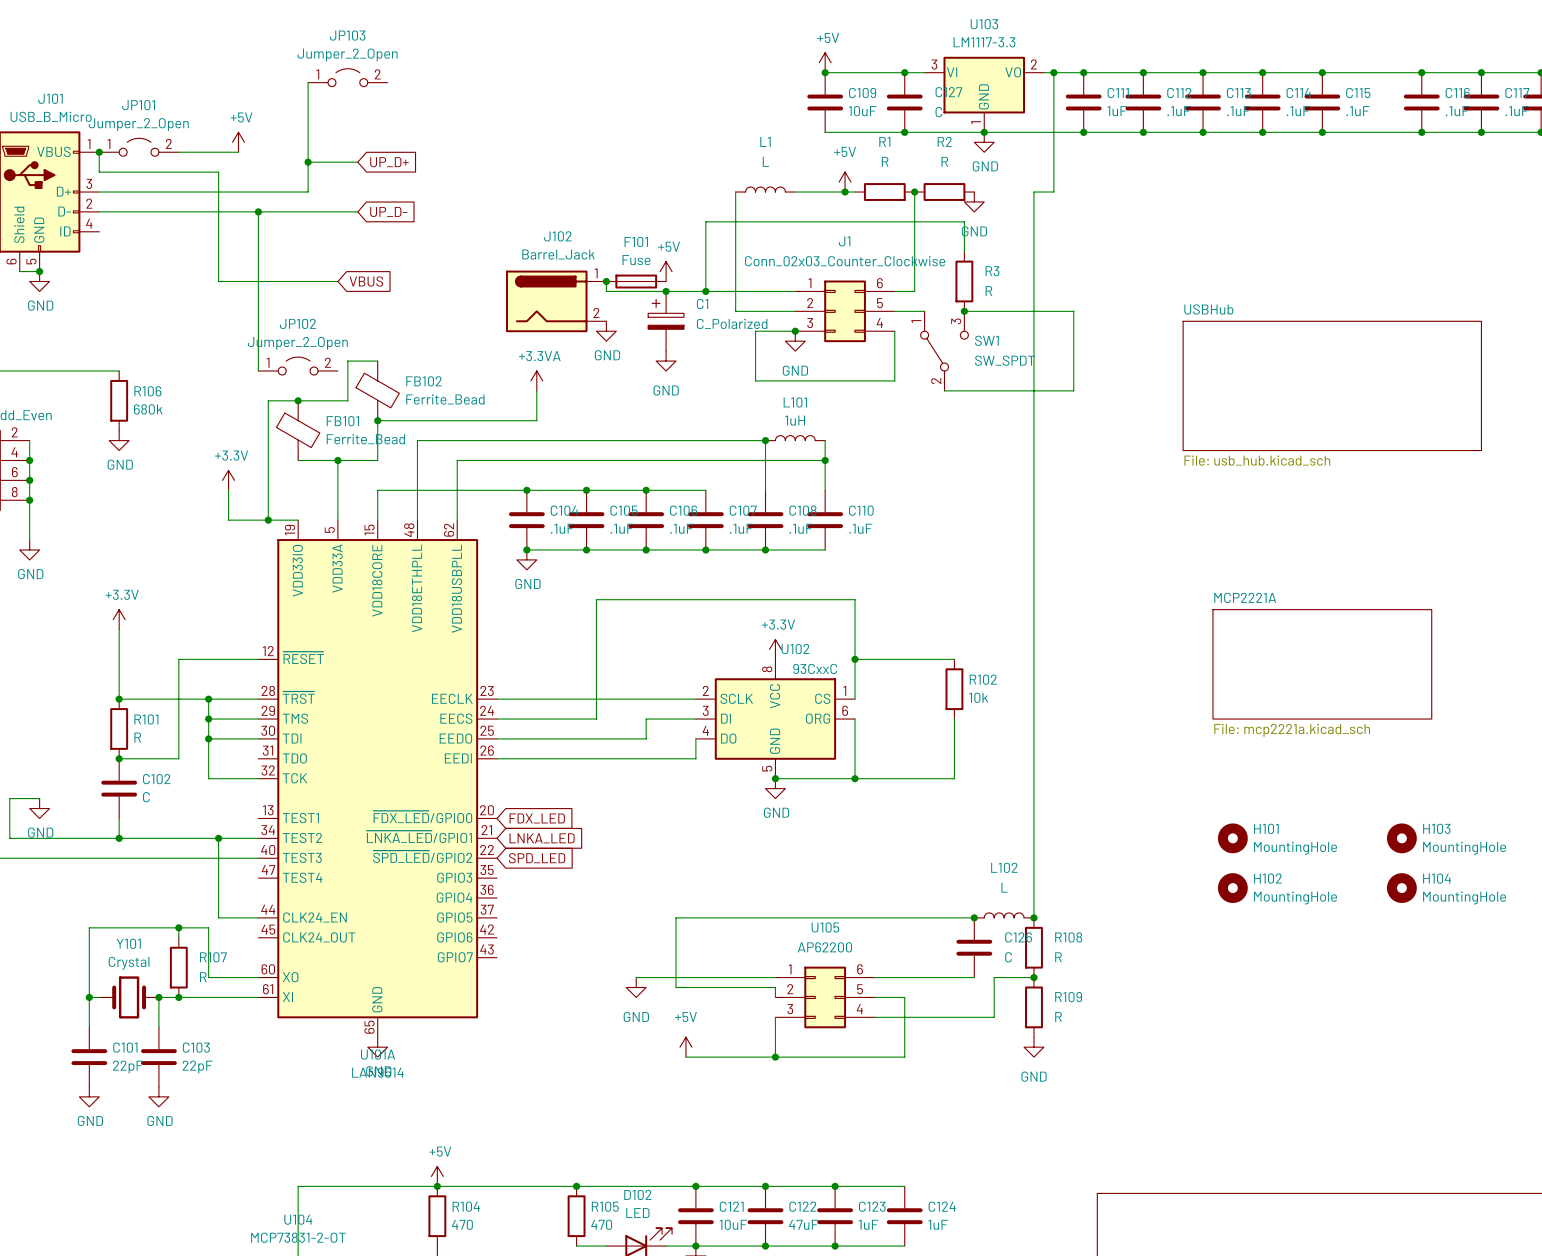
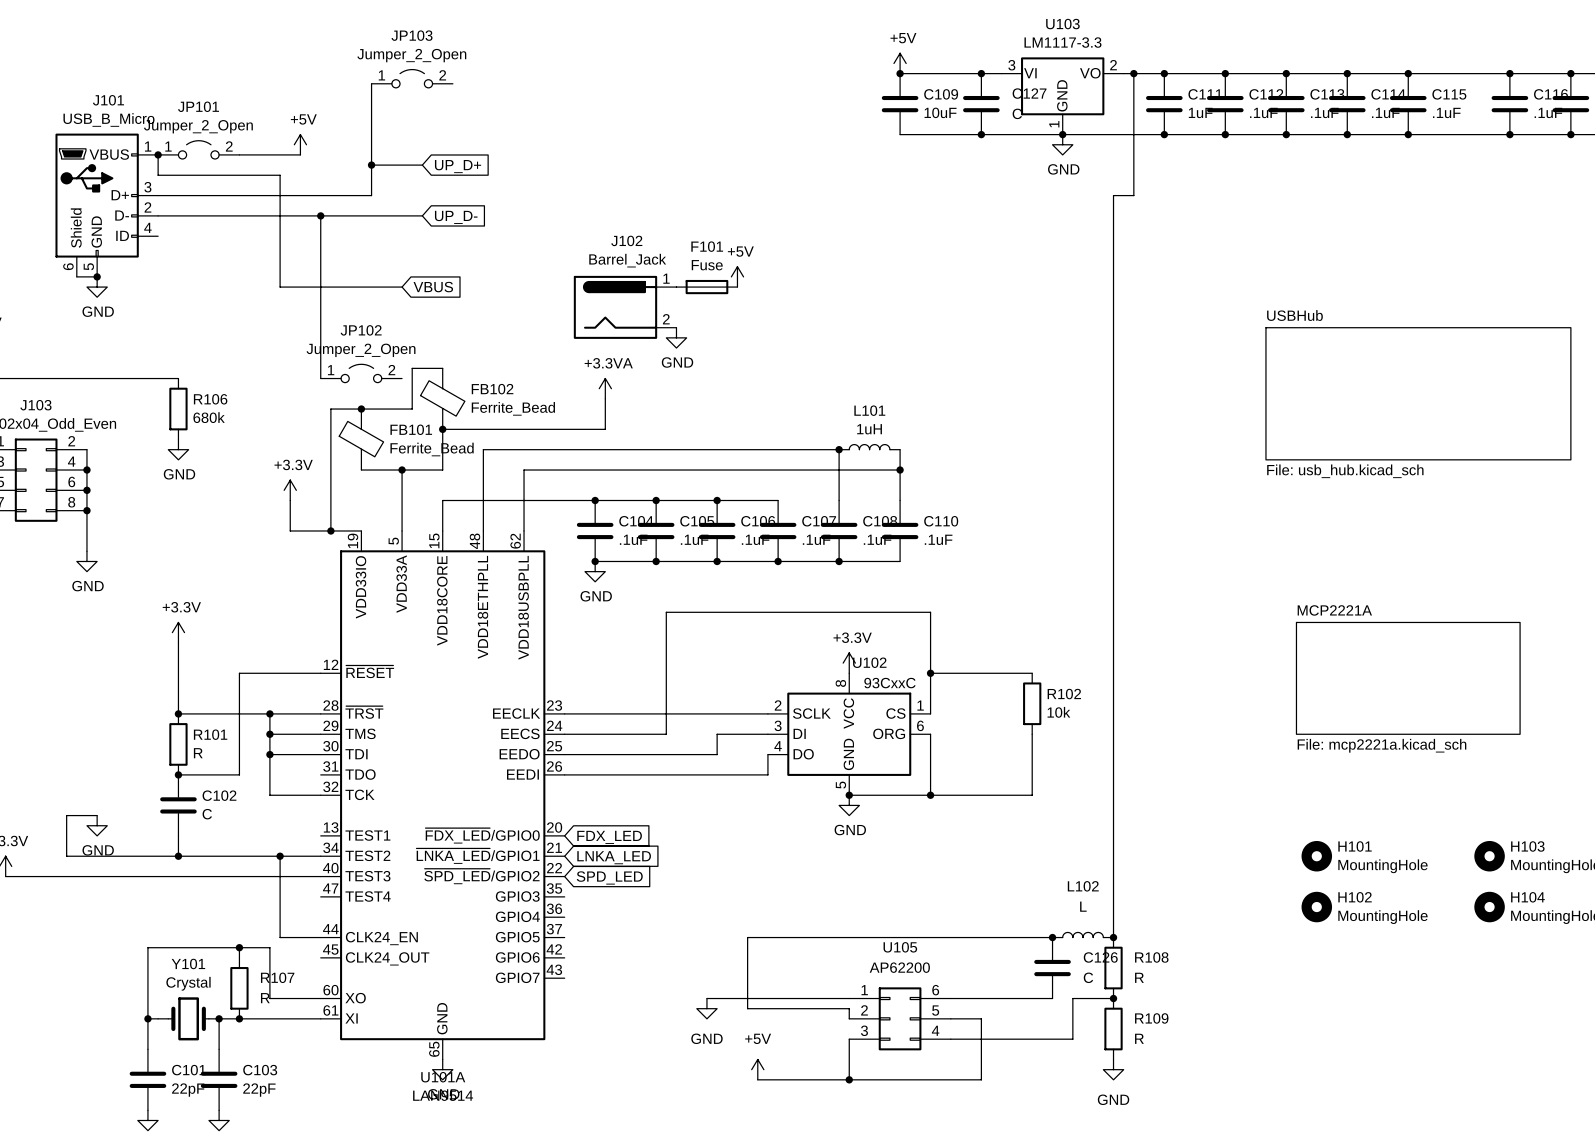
power symbol: +5V (845, 182) -> none
L1: L (765, 189) -> none
wire: (735, 192) (735, 311) (795, 311) -> none
wire: (795, 192) (855, 192) -> none
junction: (845, 192) -> none
R1: R (884, 192) -> none
wire: (914, 192) (914, 291) (894, 291) -> none
junction: (914, 192) -> none
R2: R (944, 192) -> none
power symbol: GND (974, 201) -> none
wire: (964, 251) (964, 221) (705, 221) (705, 291) -> none
wire: (606, 281) (606, 291) (795, 291) -> none
junction: (606, 281) -> none
R3: R (964, 281) -> none
junction: (666, 291) -> none
junction: (705, 291) -> none
J1: Conn_02x03_Counter_Clockwise (845, 311) -> none
wire: (894, 311) (924, 311) -> none
wire: (964, 311) (1073, 311) (1073, 390) (944, 390) -> none
junction: (964, 311) -> none
C1: C_Polarized (666, 321) -> none
wire: (795, 331) (755, 331) (755, 380) (894, 380) (894, 331) -> none
junction: (795, 331) -> none
power symbol: GND (795, 341) -> none
SW1: SW_SPDT (944, 351) -> none
power symbol: GND (666, 361) -> none

